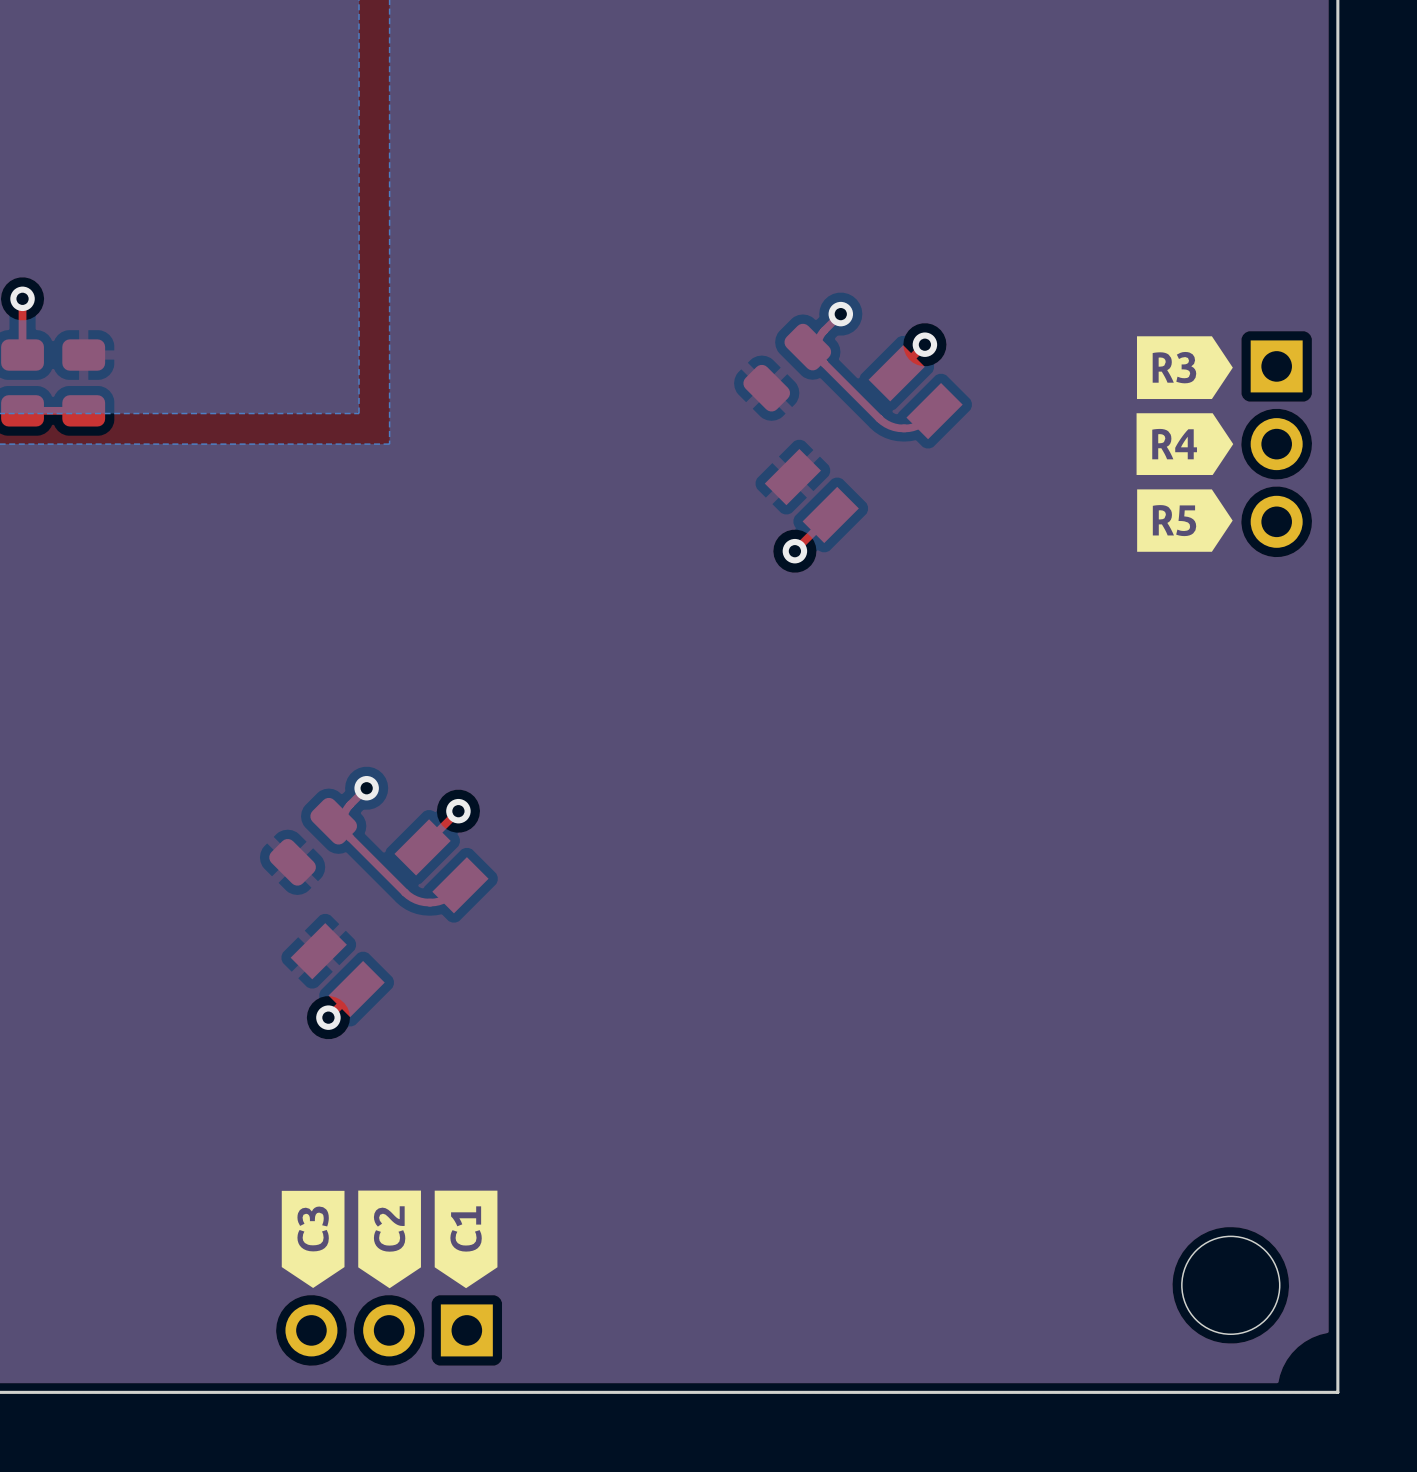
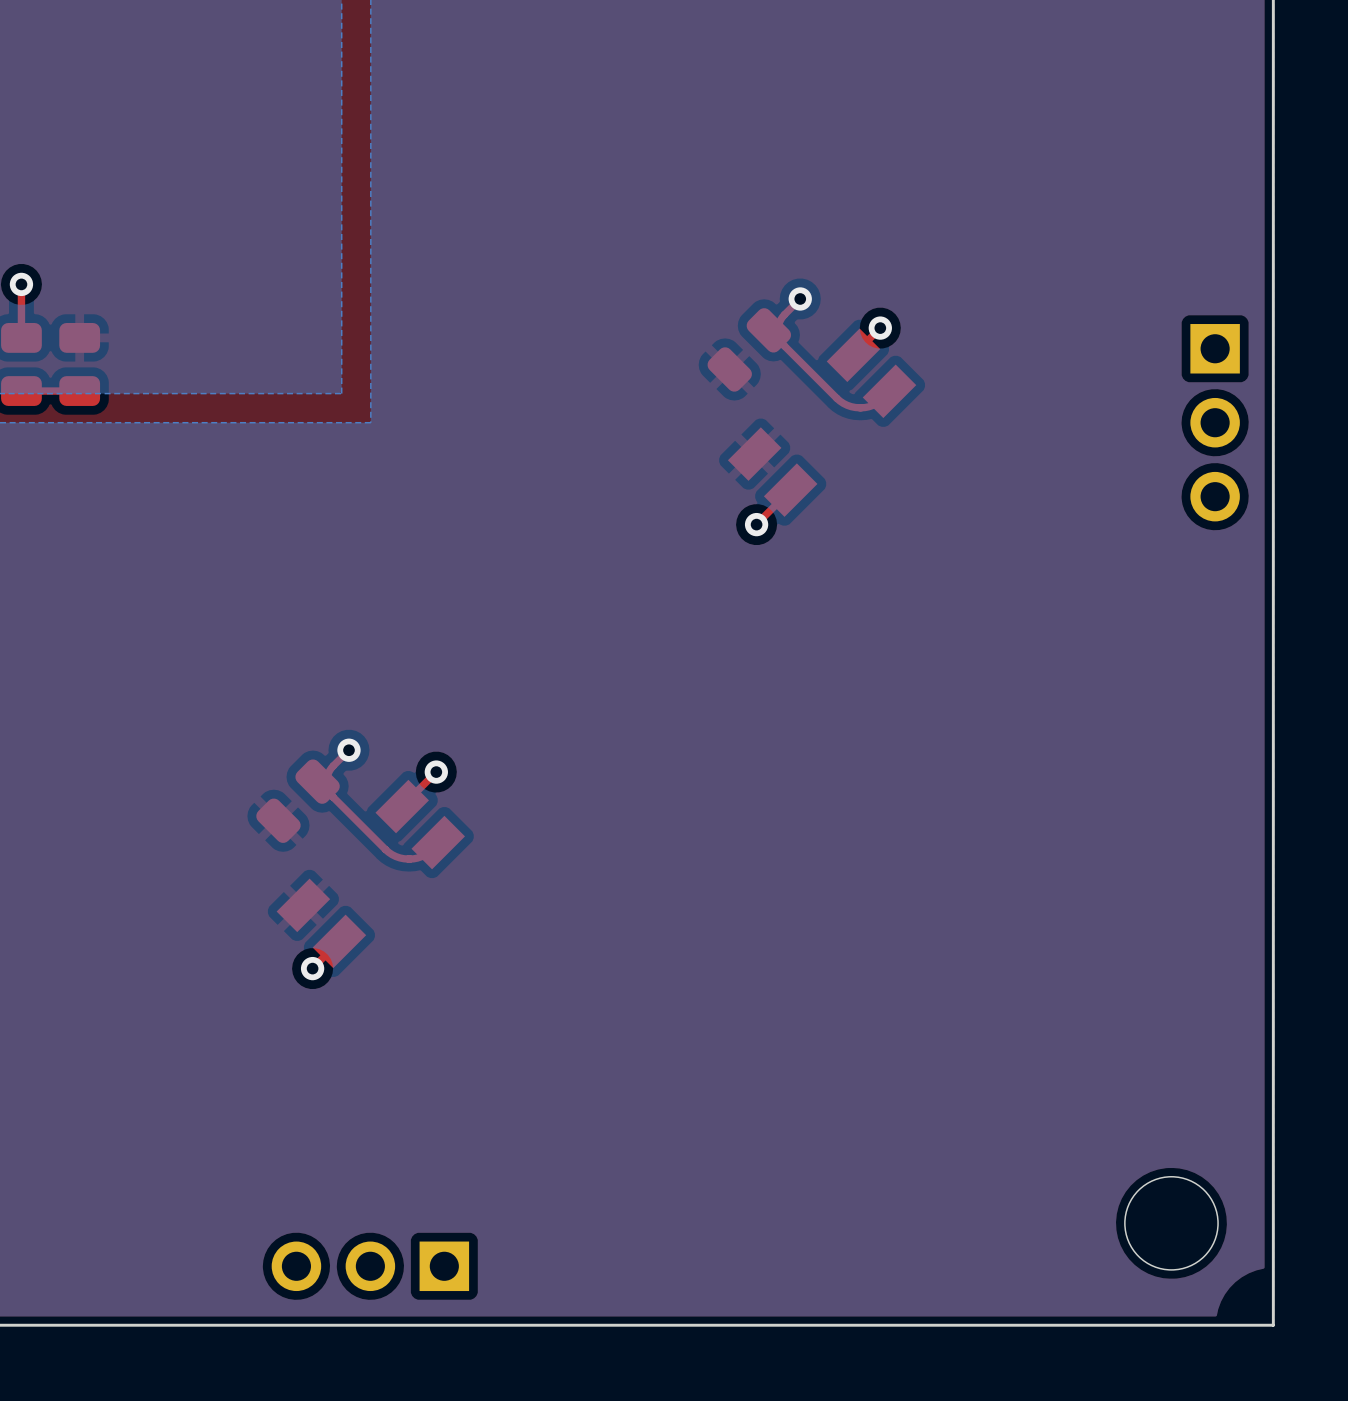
drawing: [1136, 336, 1234, 552] -> none
drawing: [281, 1190, 498, 1289] -> none

